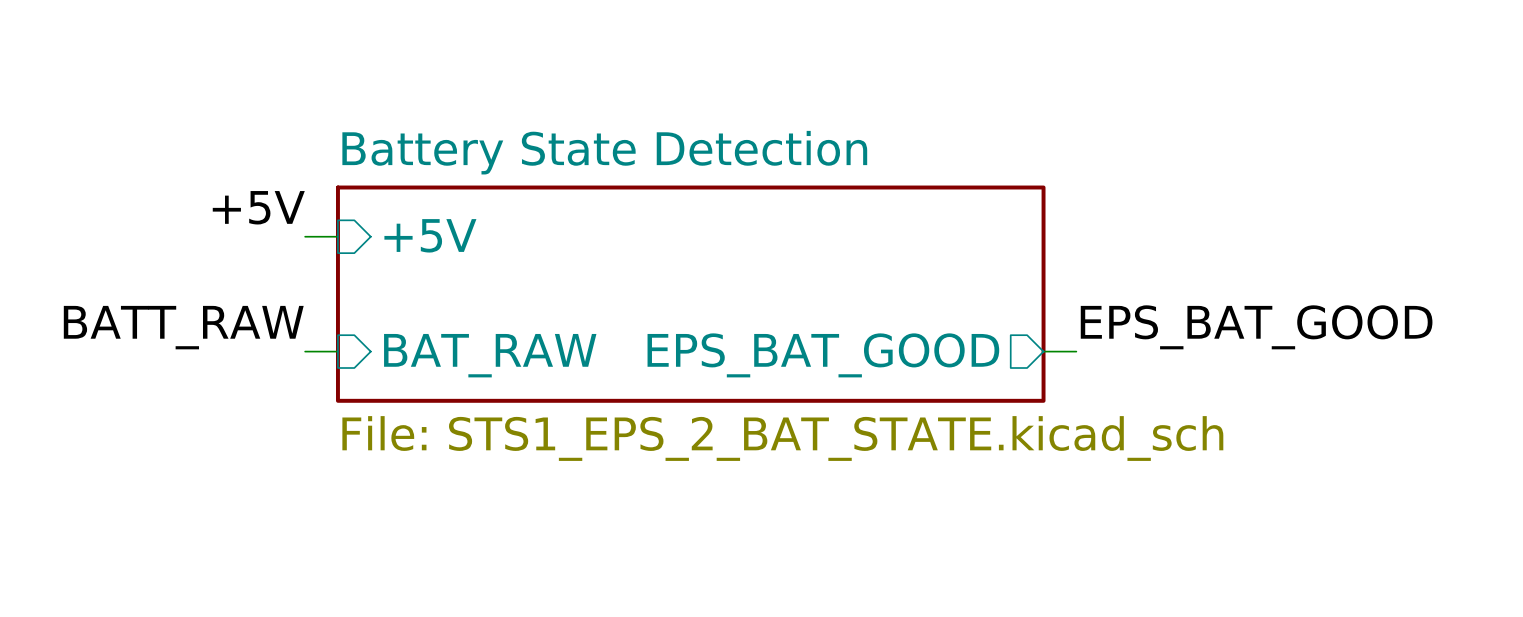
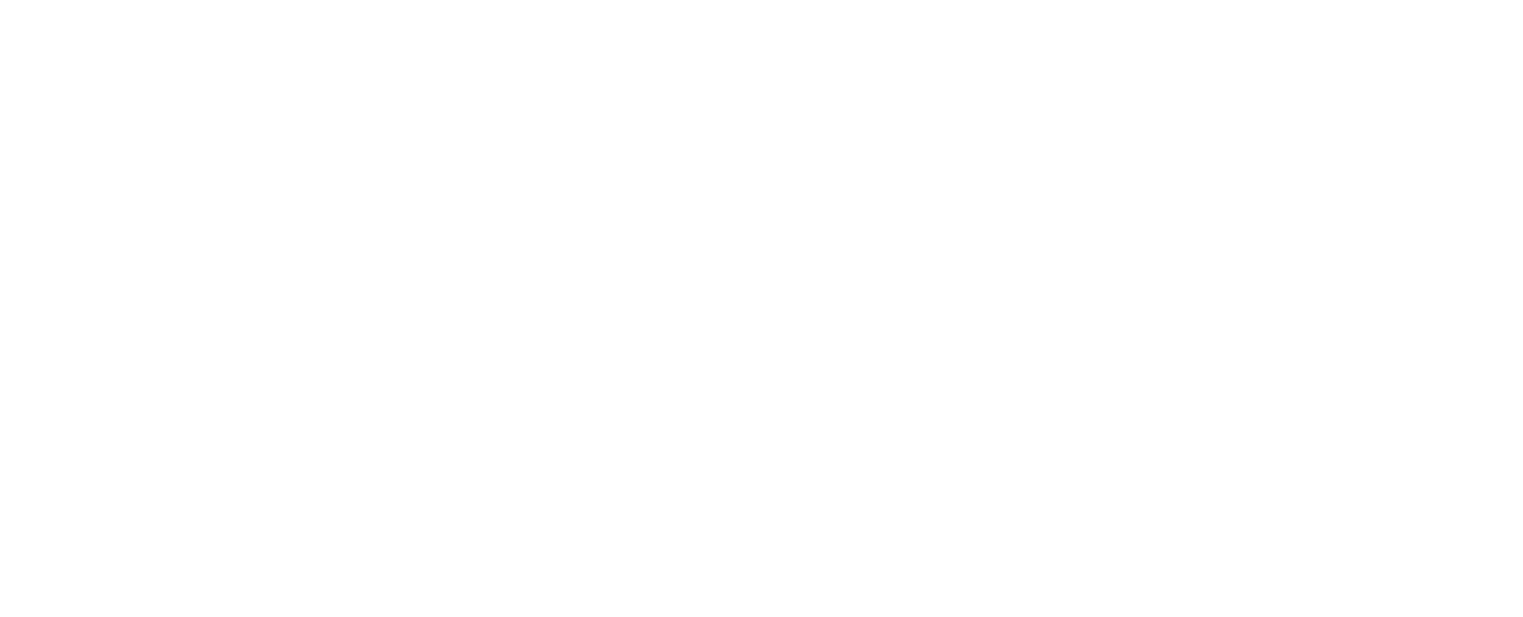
label: +5V (258, 207) -> none
sheet pin: +5V (430, 235) -> none
wire: (305, 236) (337, 236) -> none
sheet Battery State Detection: File: STS1_EPS_2_BAT_STATE.kicad_sch (690, 294) -> none
label: BATT_RAW (183, 327) -> none
label: EPS_BAT_GOOD (1256, 327) -> none
wire: (305, 351) (337, 351) -> none
wire: (1043, 351) (1076, 351) -> none
sheet pin: BAT_RAW (490, 355) -> none
sheet pin: EPS_BAT_GOOD (823, 355) -> none

